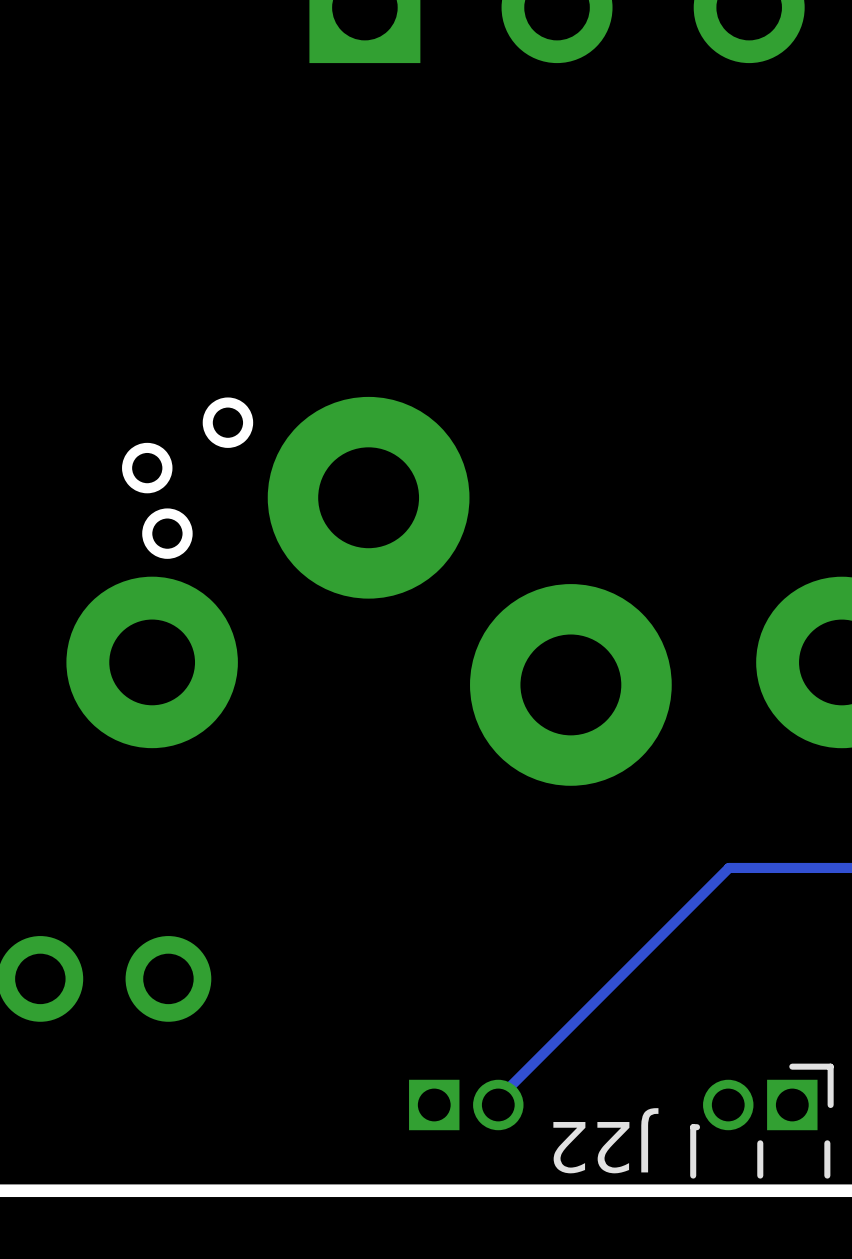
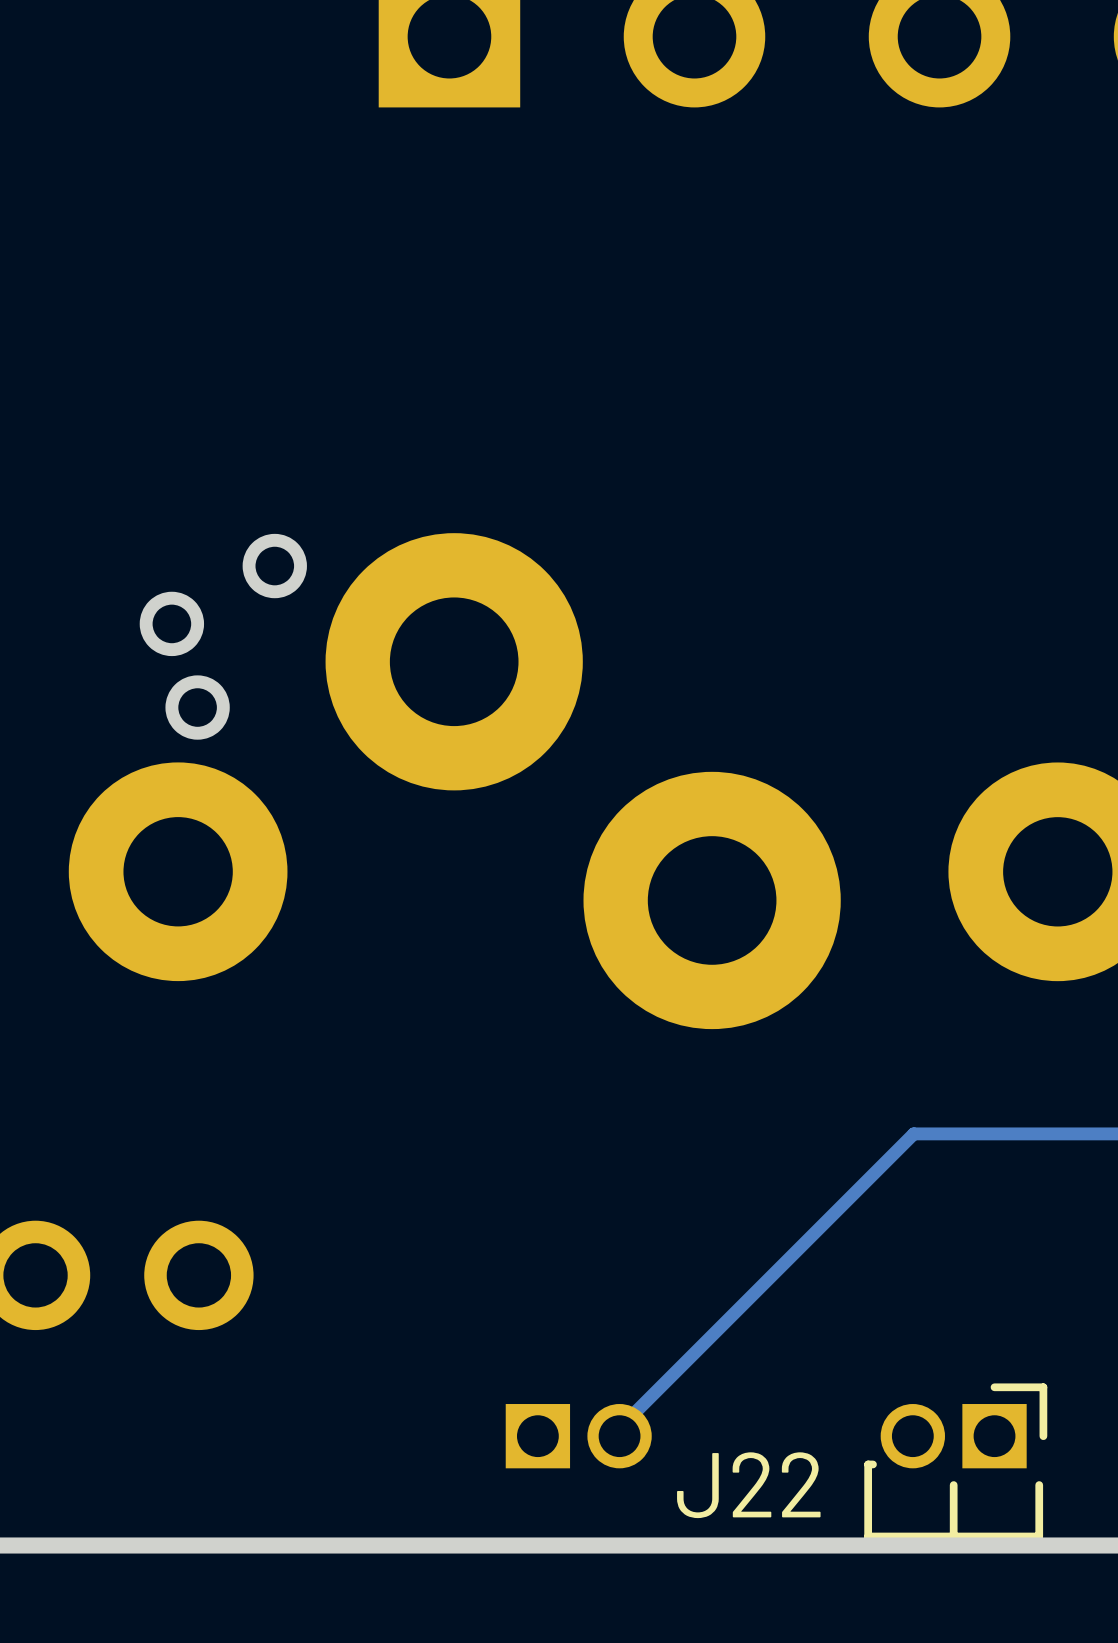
J22 footprint: [690, 1063, 834, 1179] -> [864, 1383, 1048, 1541]
J22 name rotation: 0° (605, 1140) -> 180° (748, 1485)

